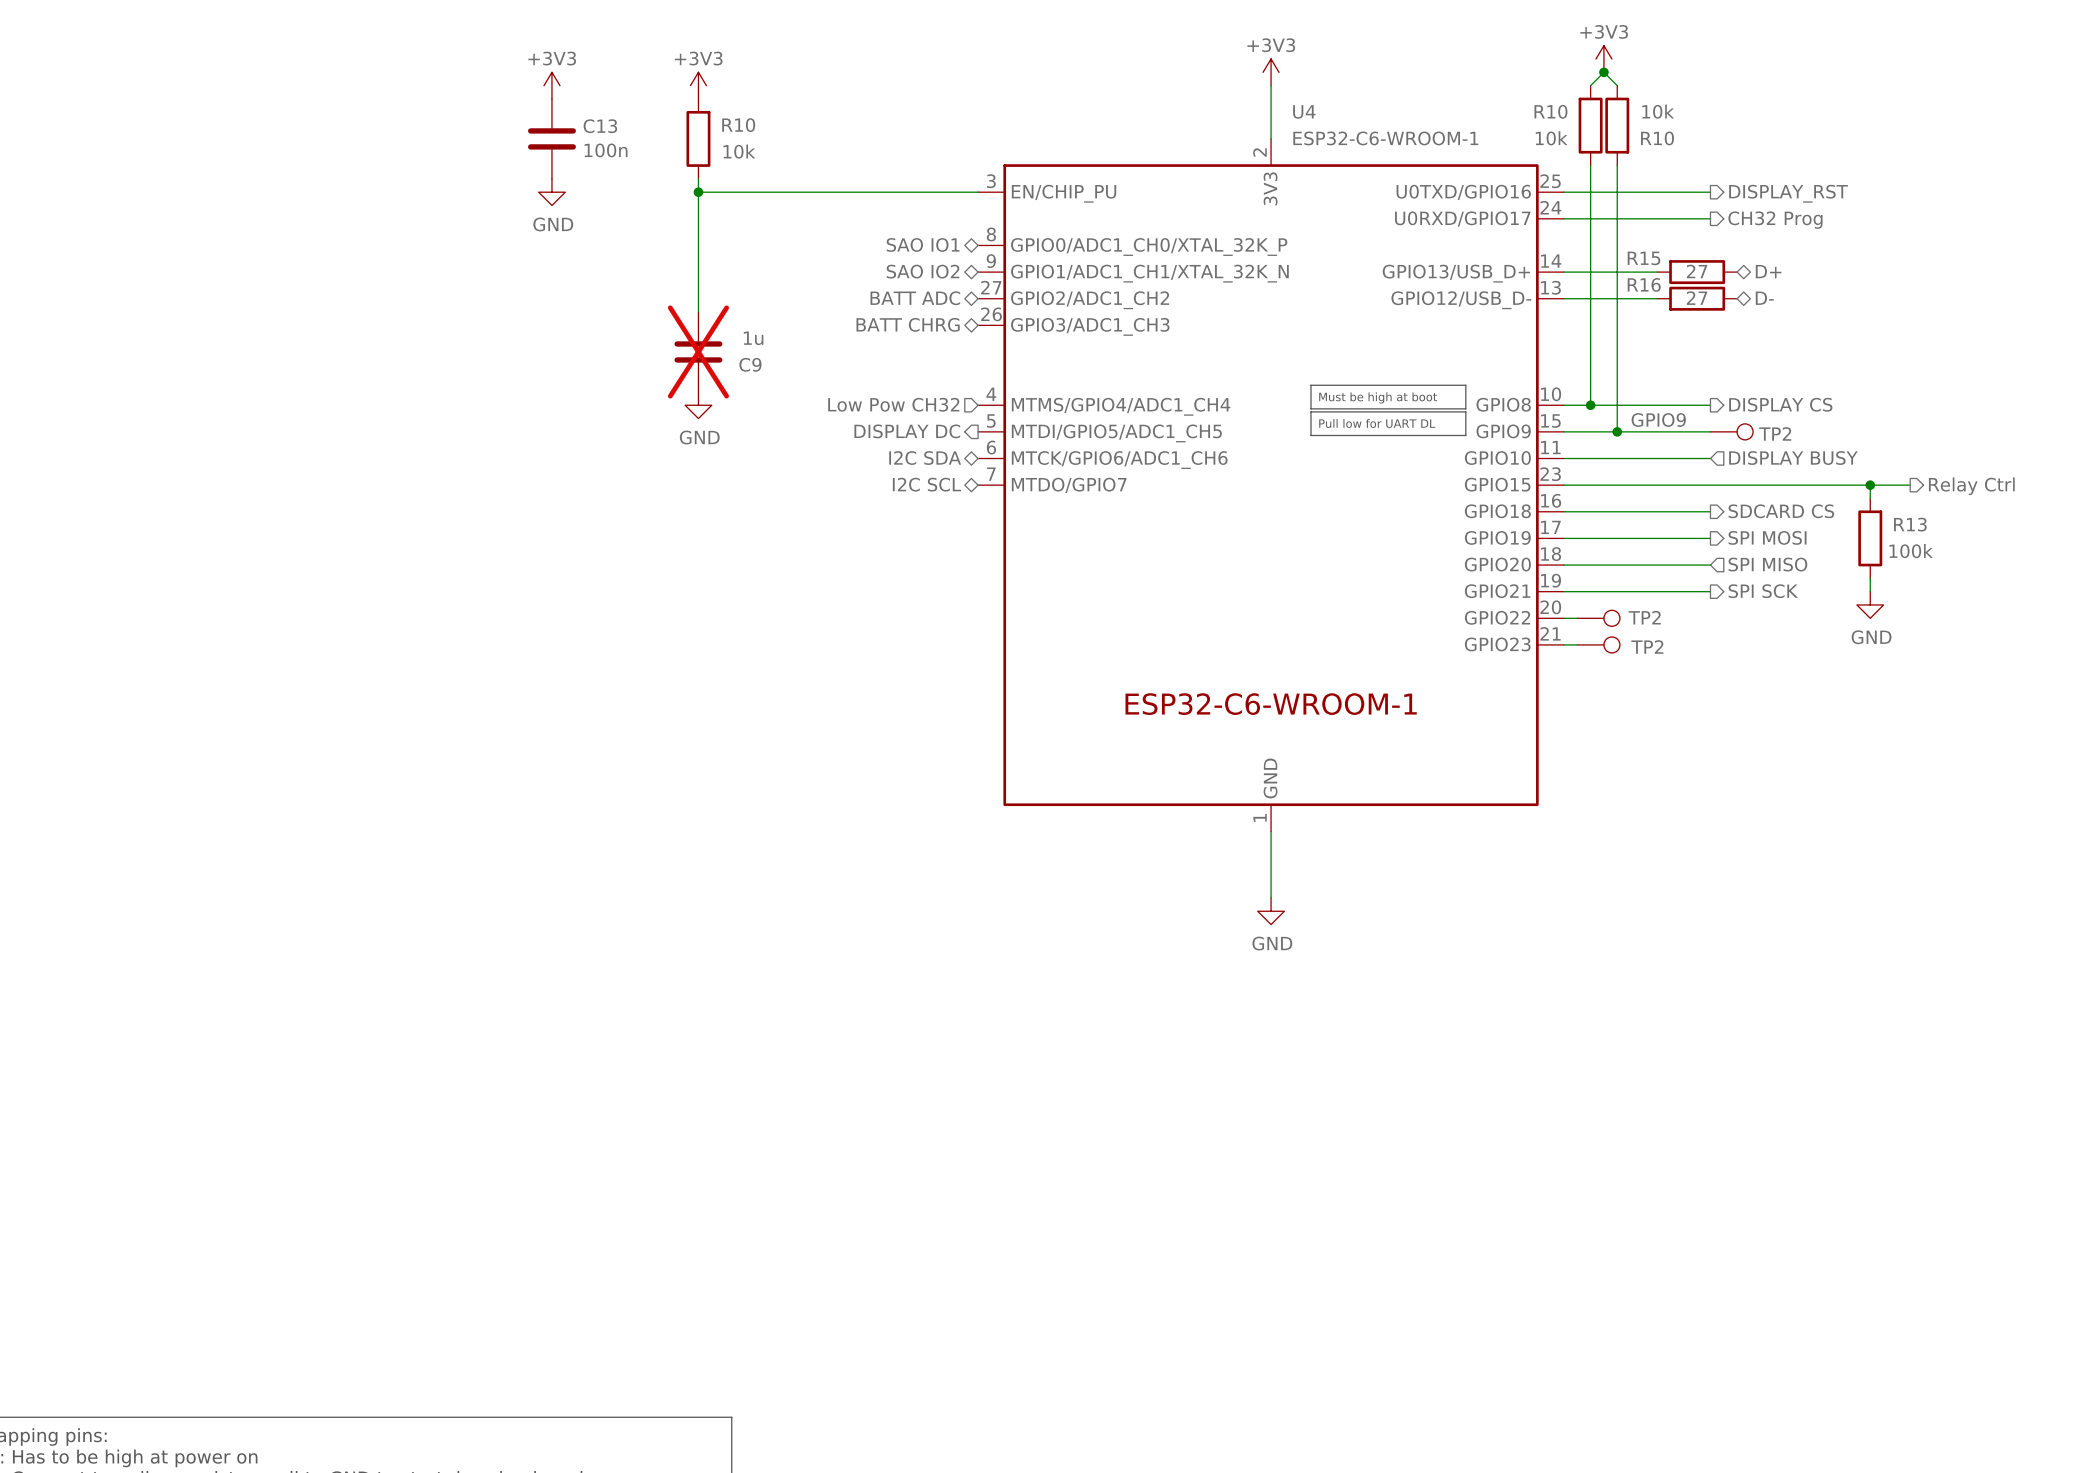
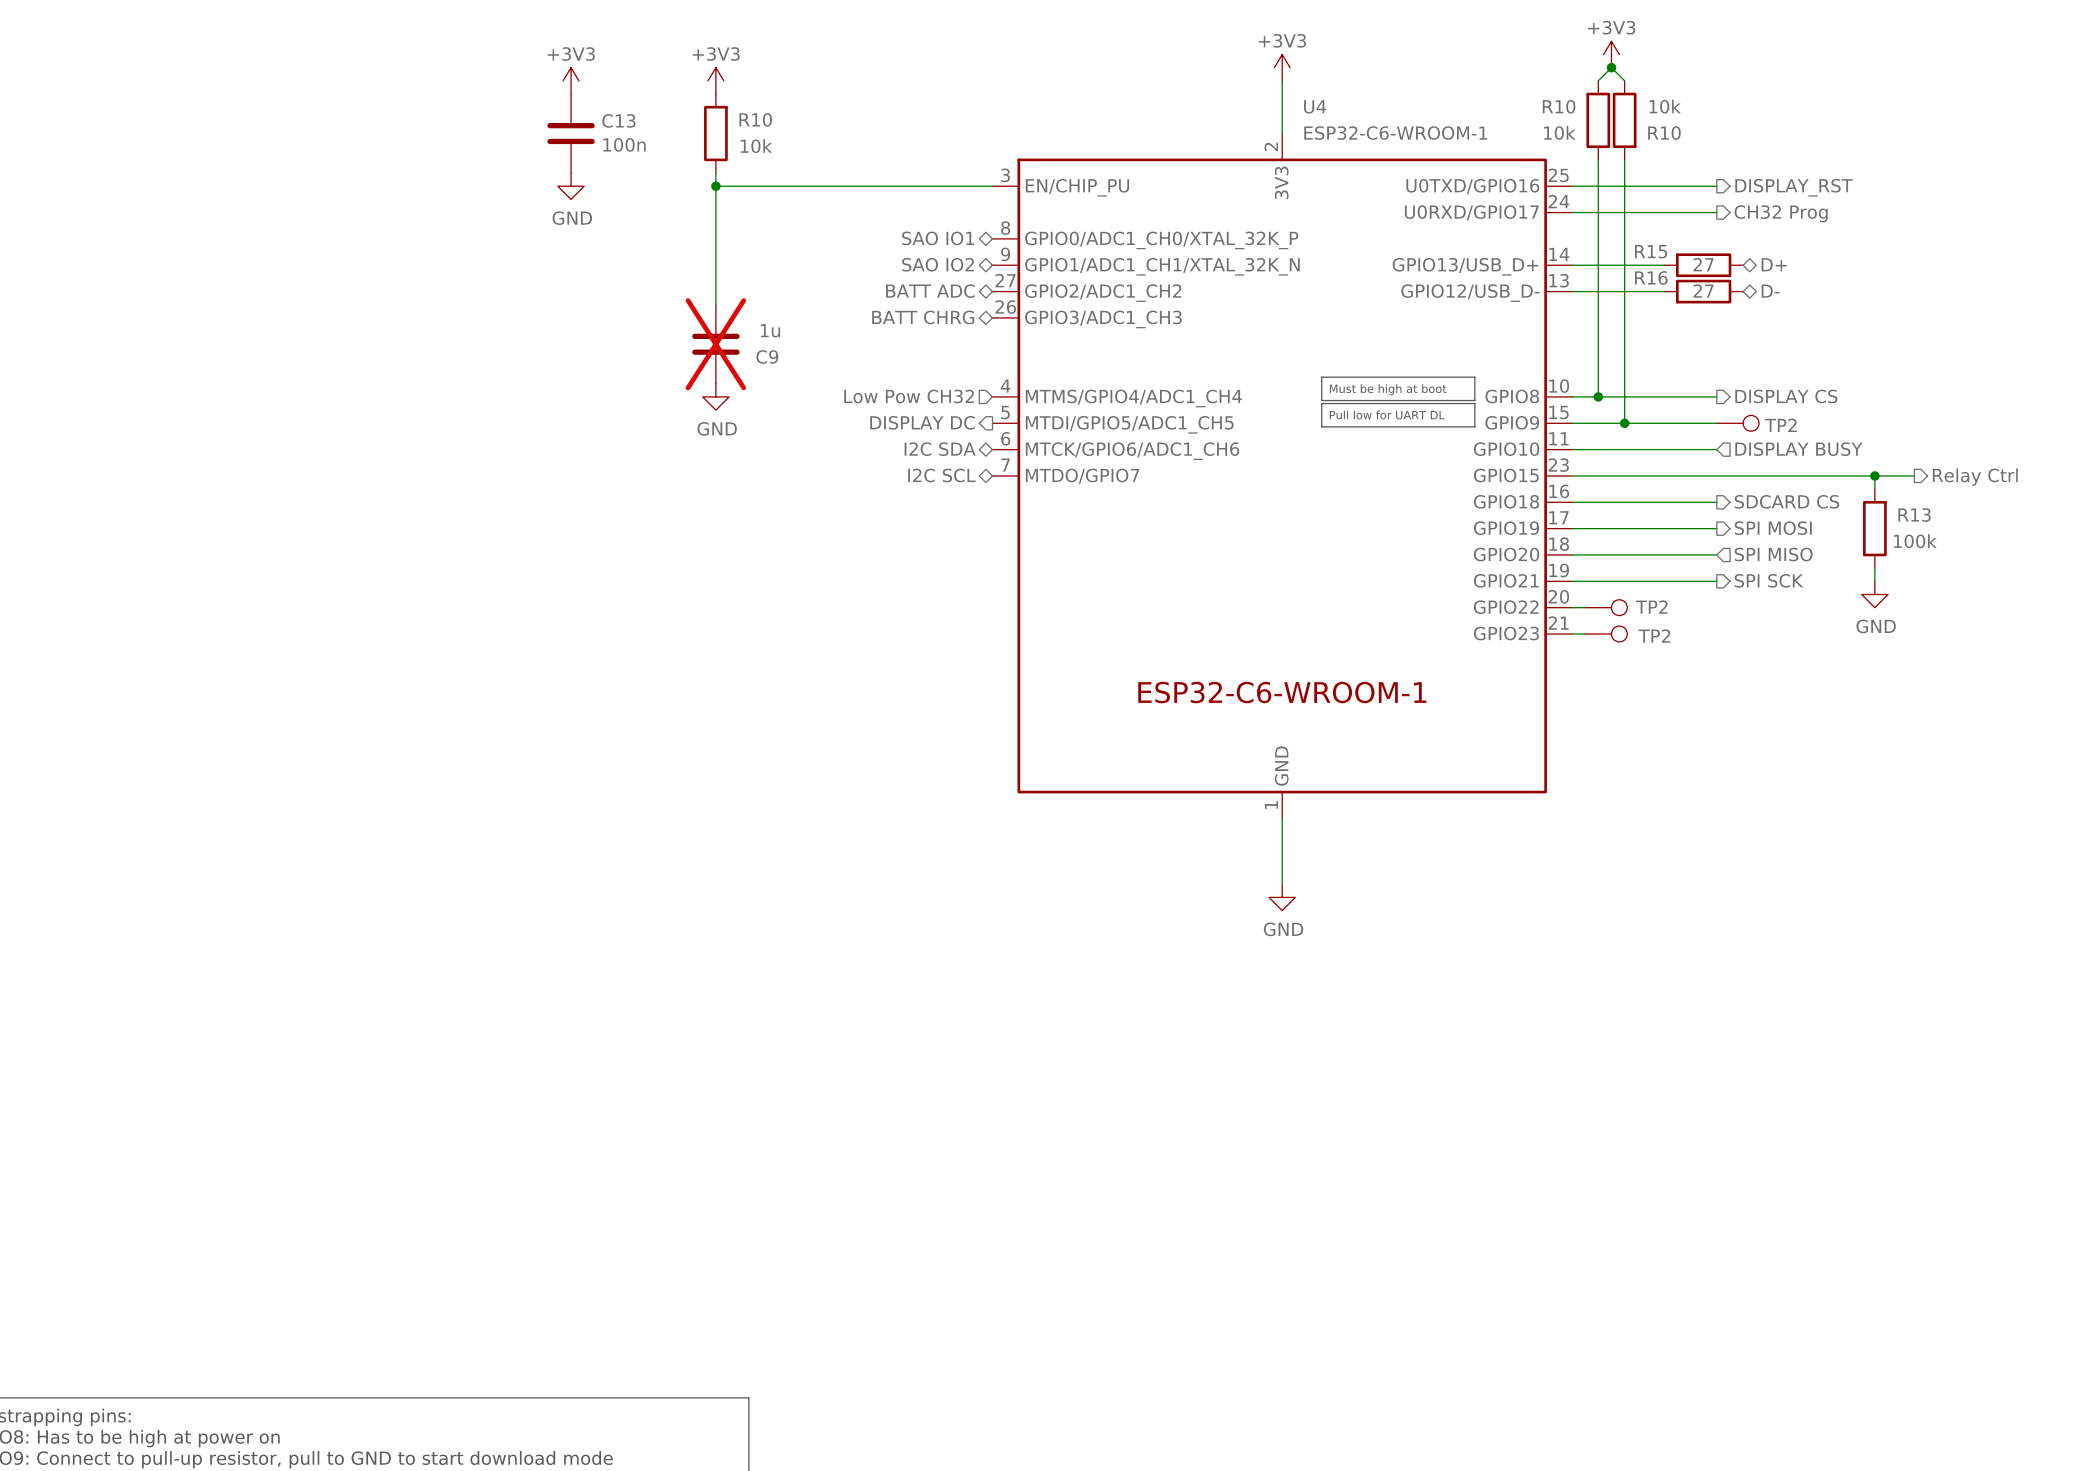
label: GPIO9 (1658, 420) -> none

